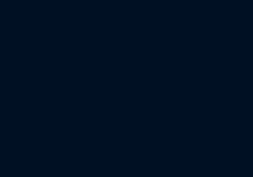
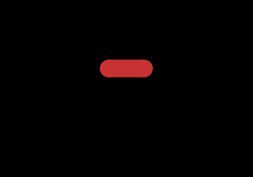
part: none -> (126, 68)

